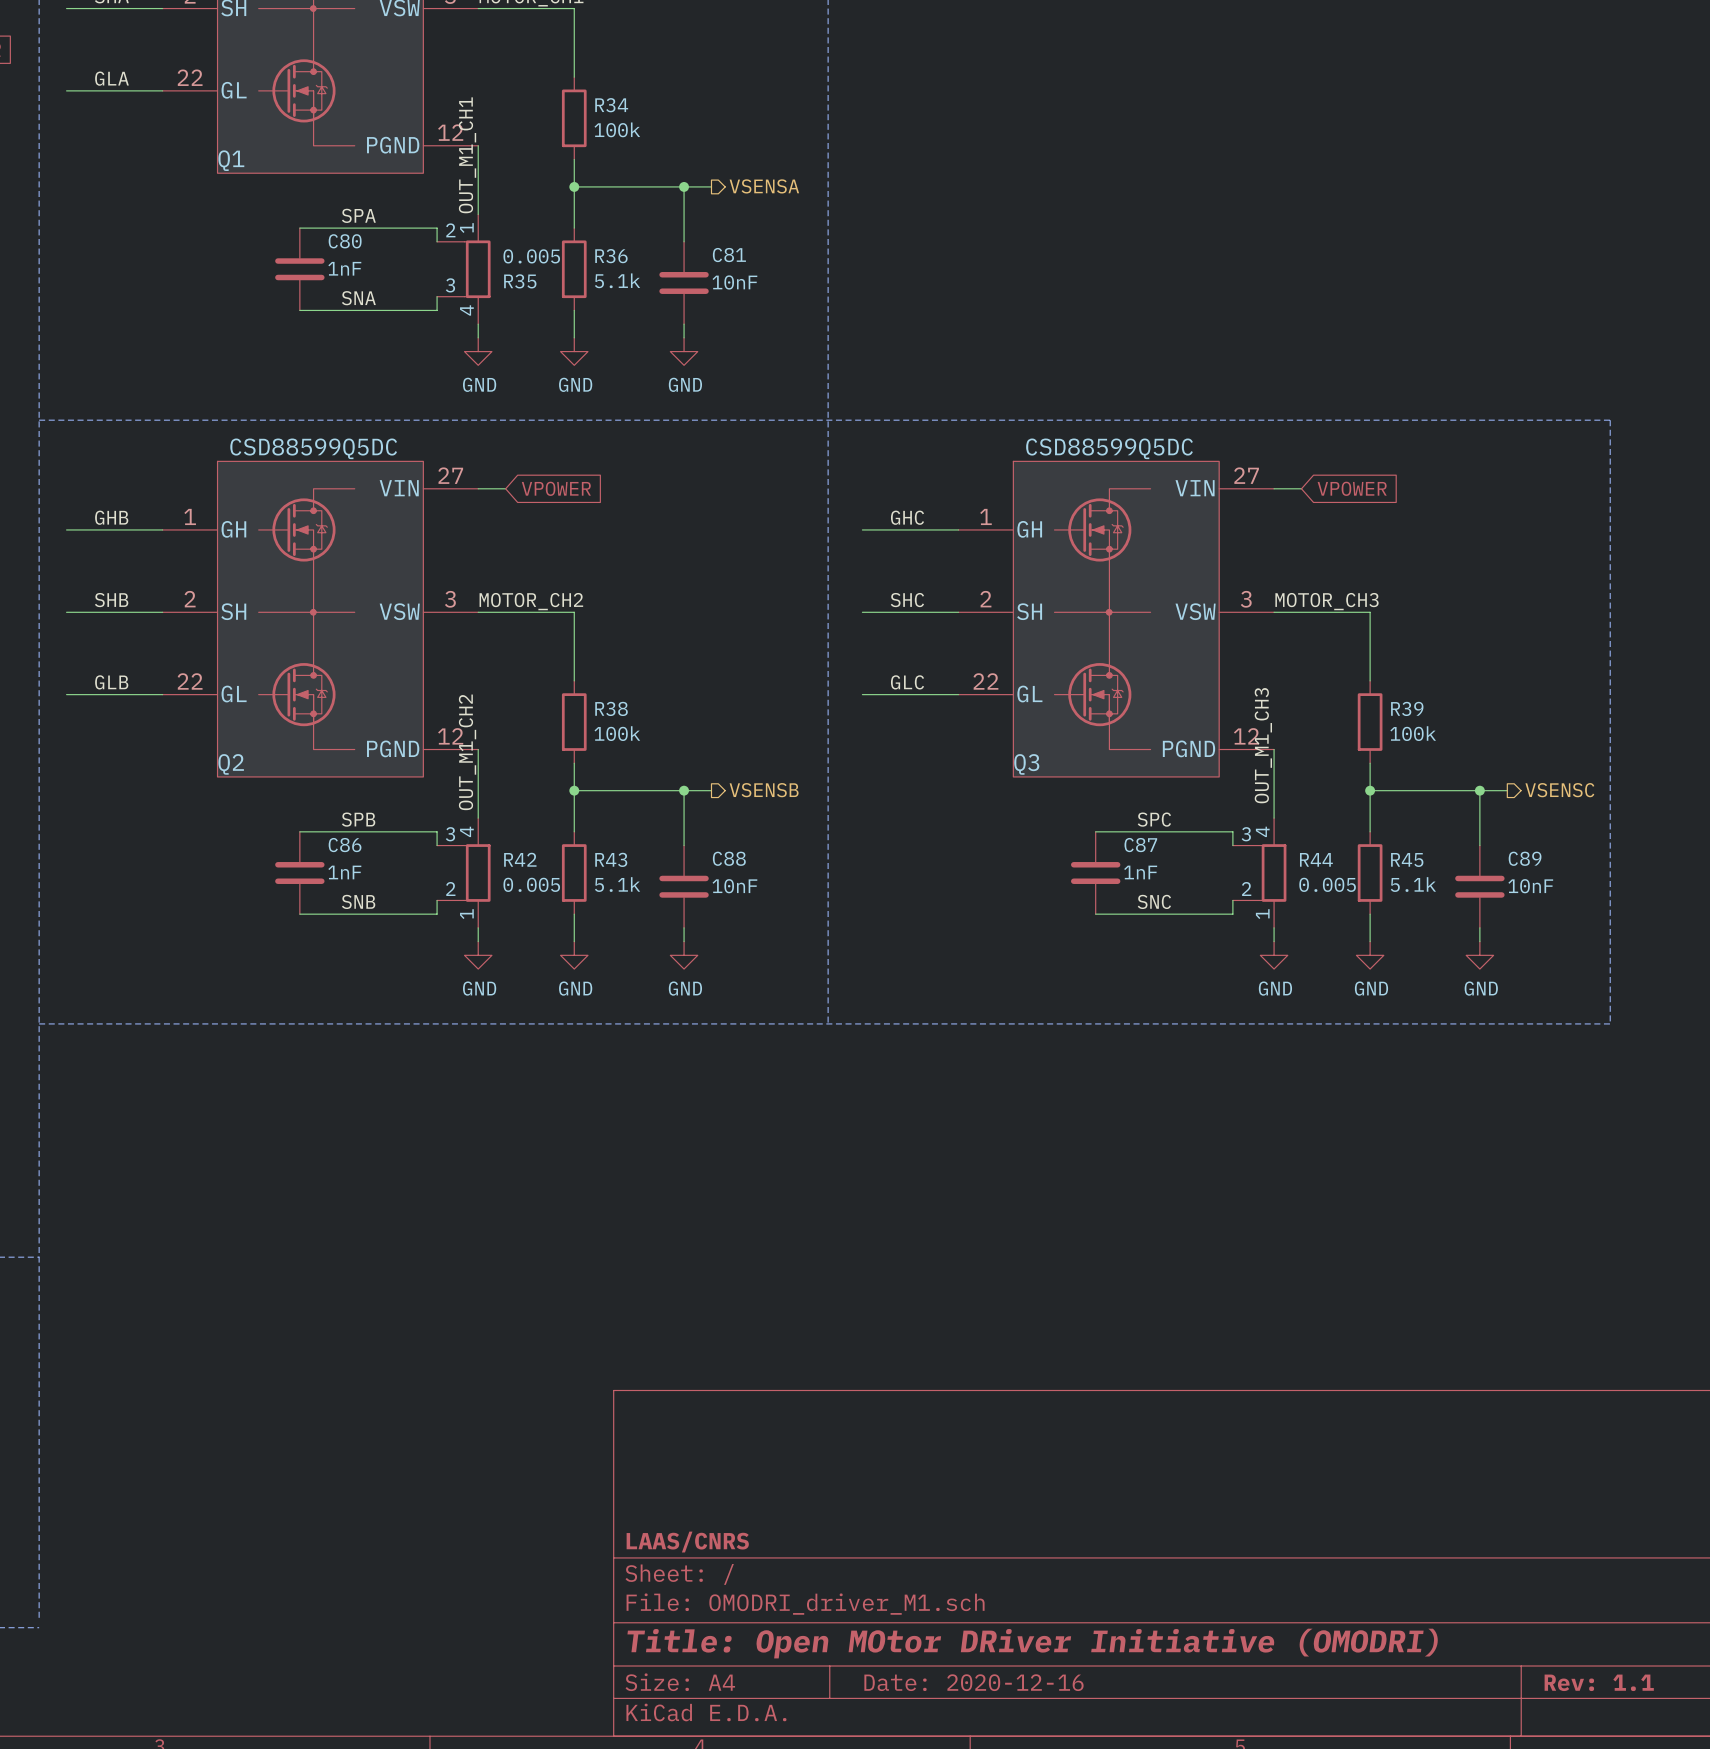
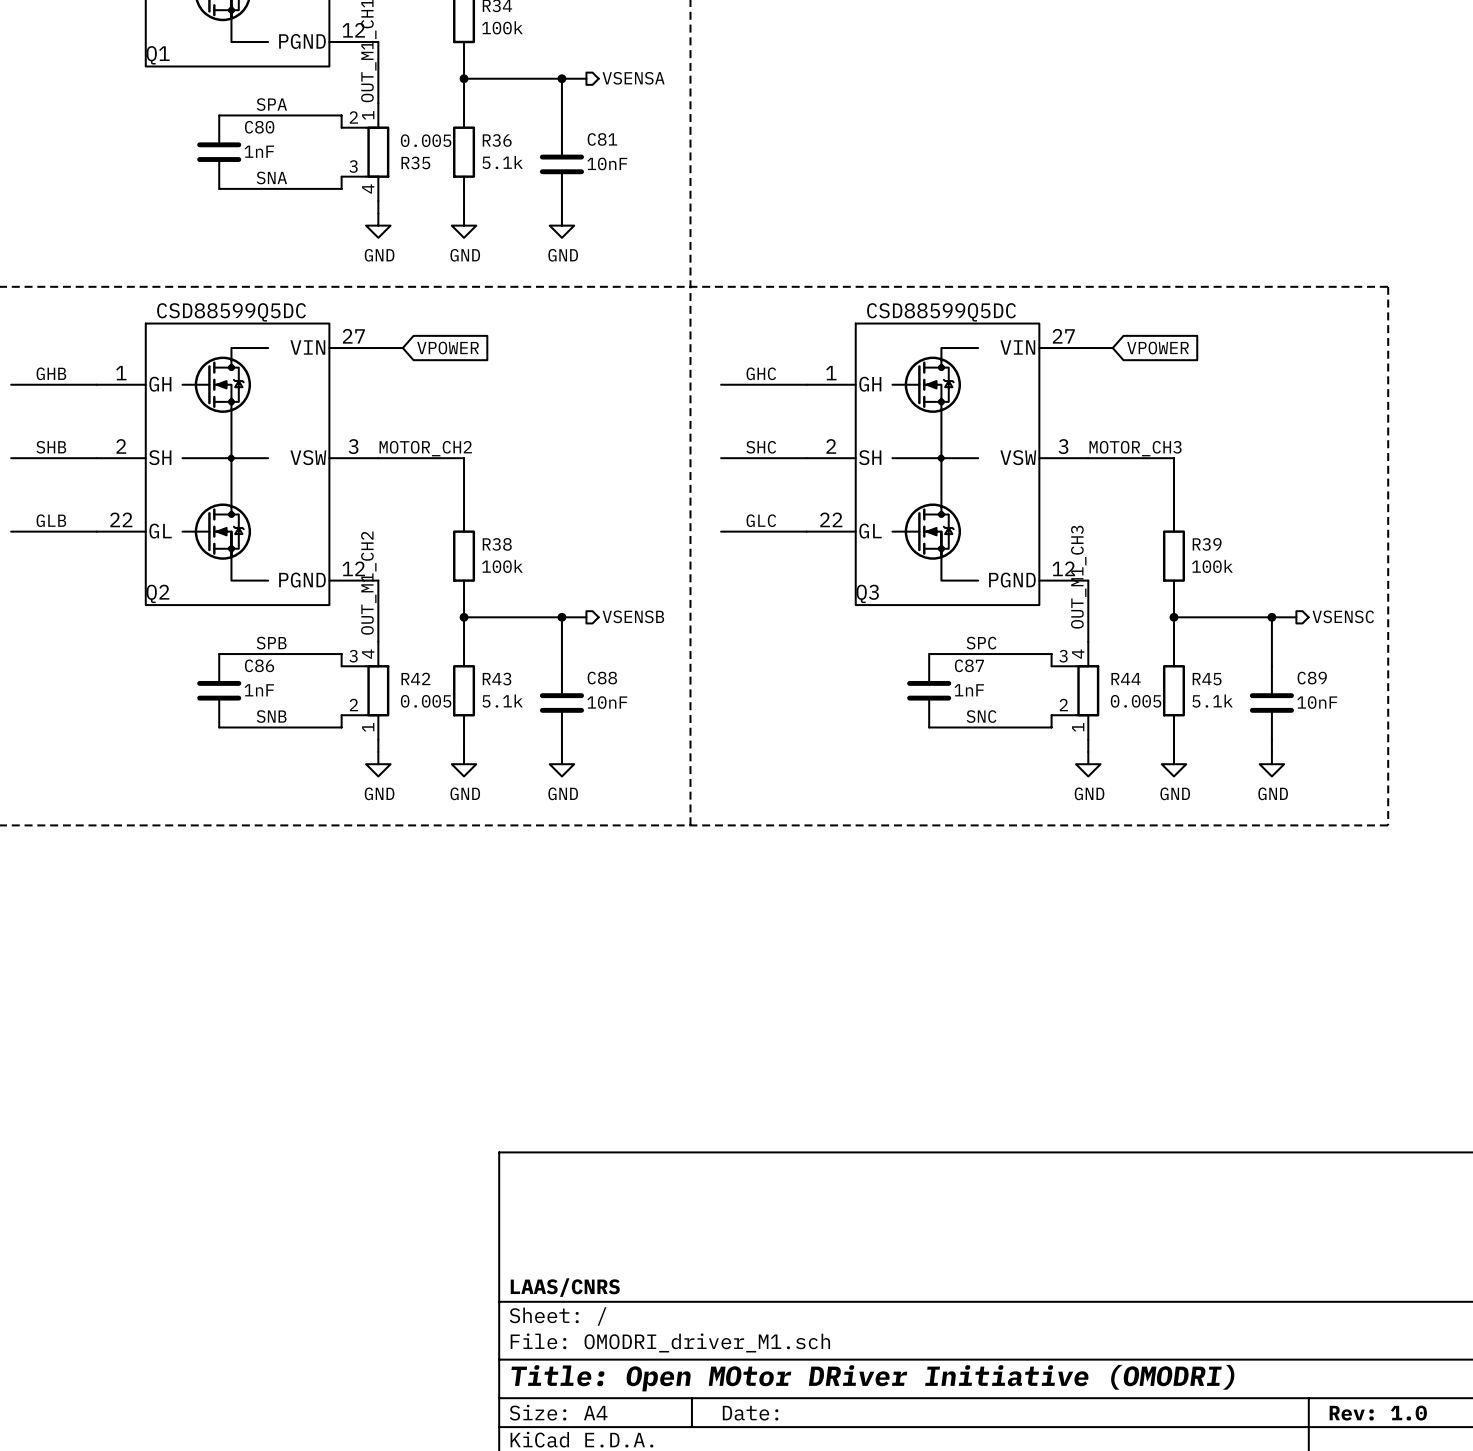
title block: Date: 2020-12-16 (973, 1682) -> Date: (750, 1413)
title block: Rev: 1.1 (1599, 1682) -> Rev: 1.0 (1378, 1413)

